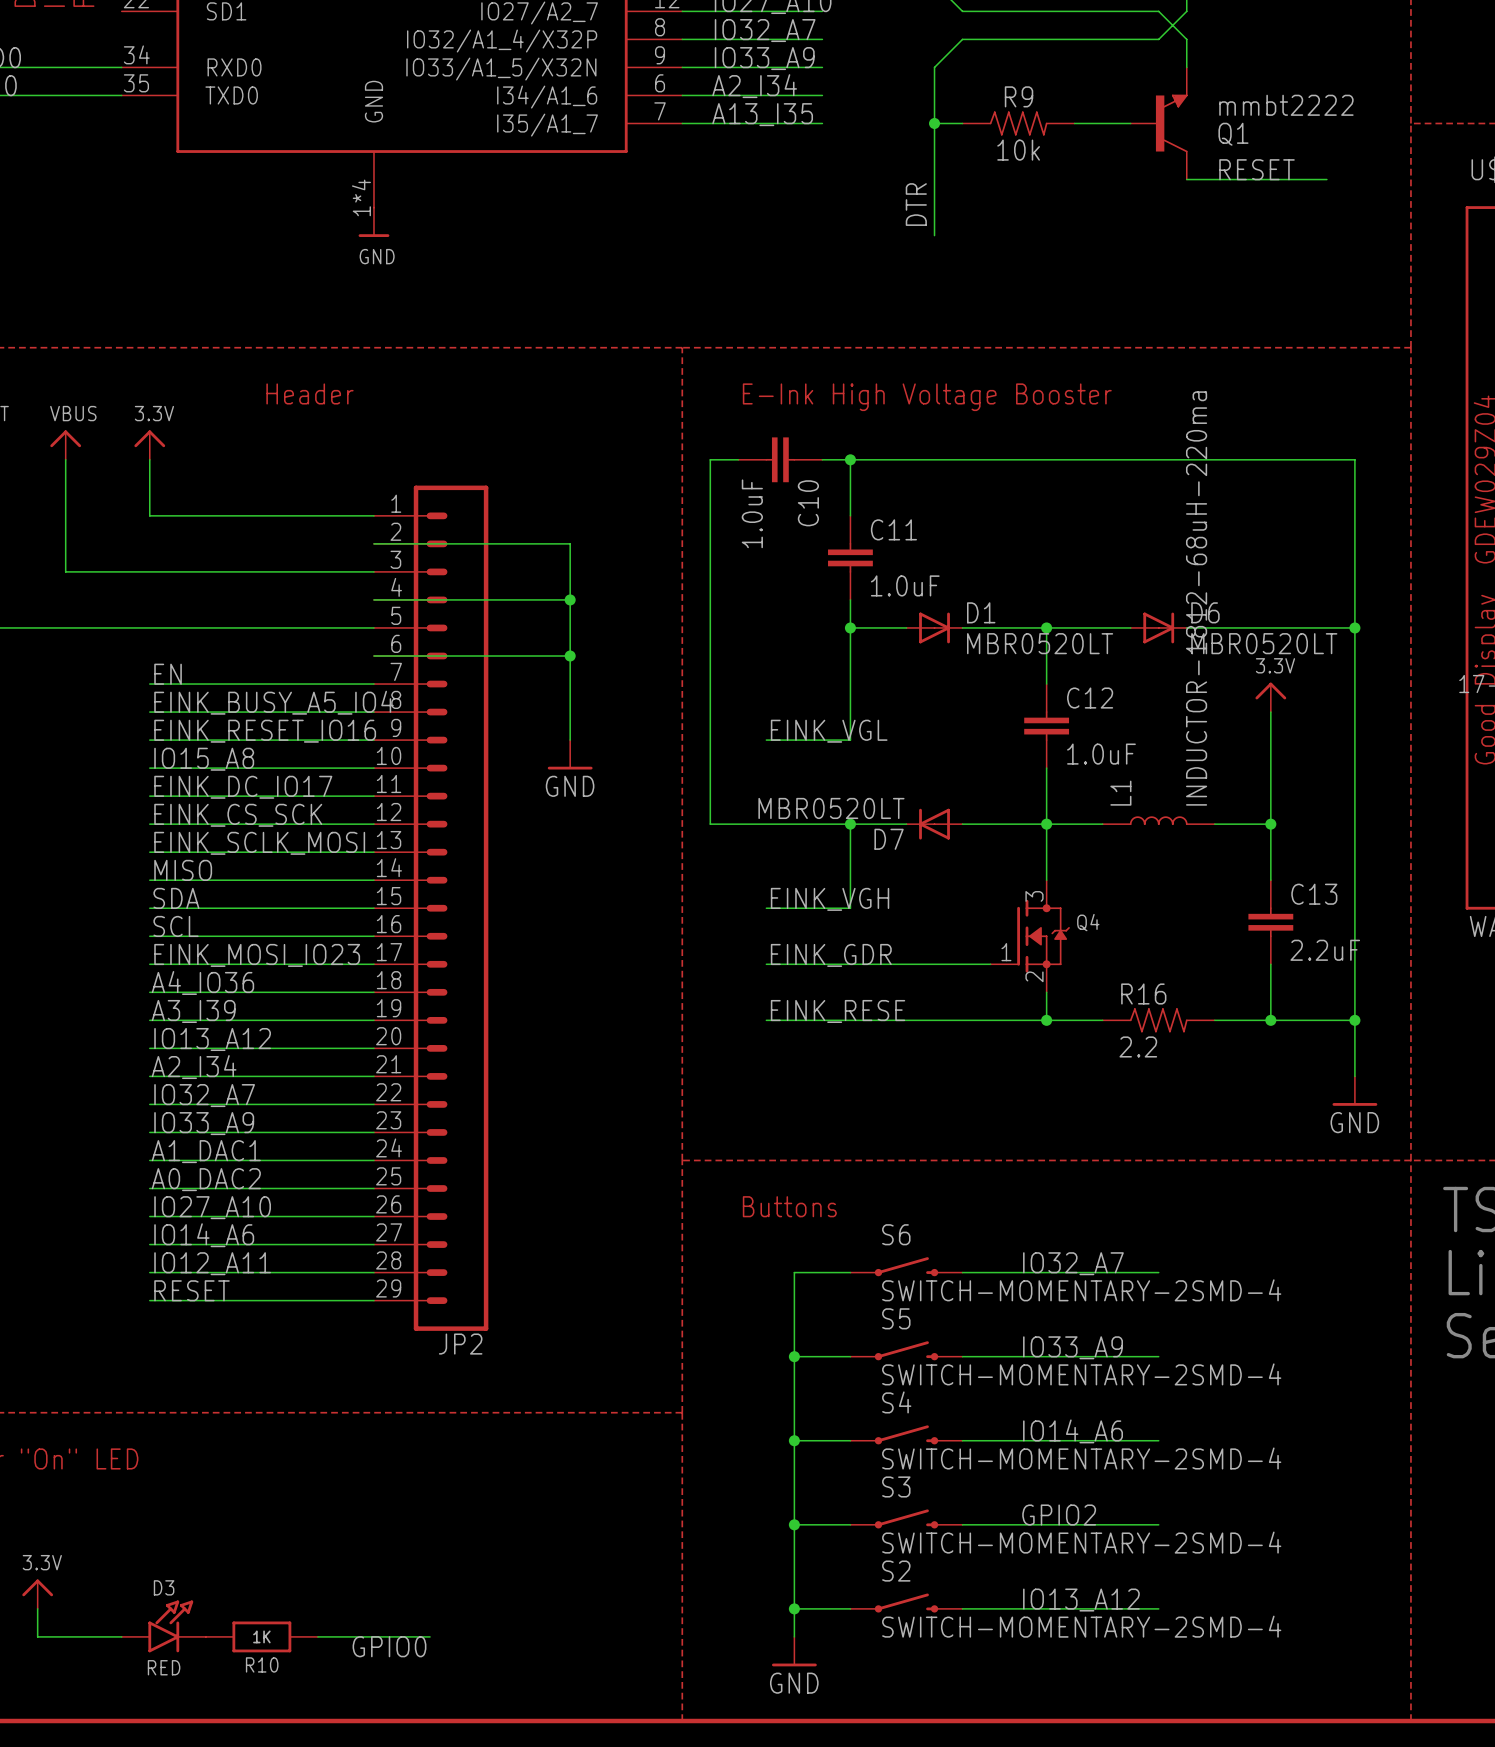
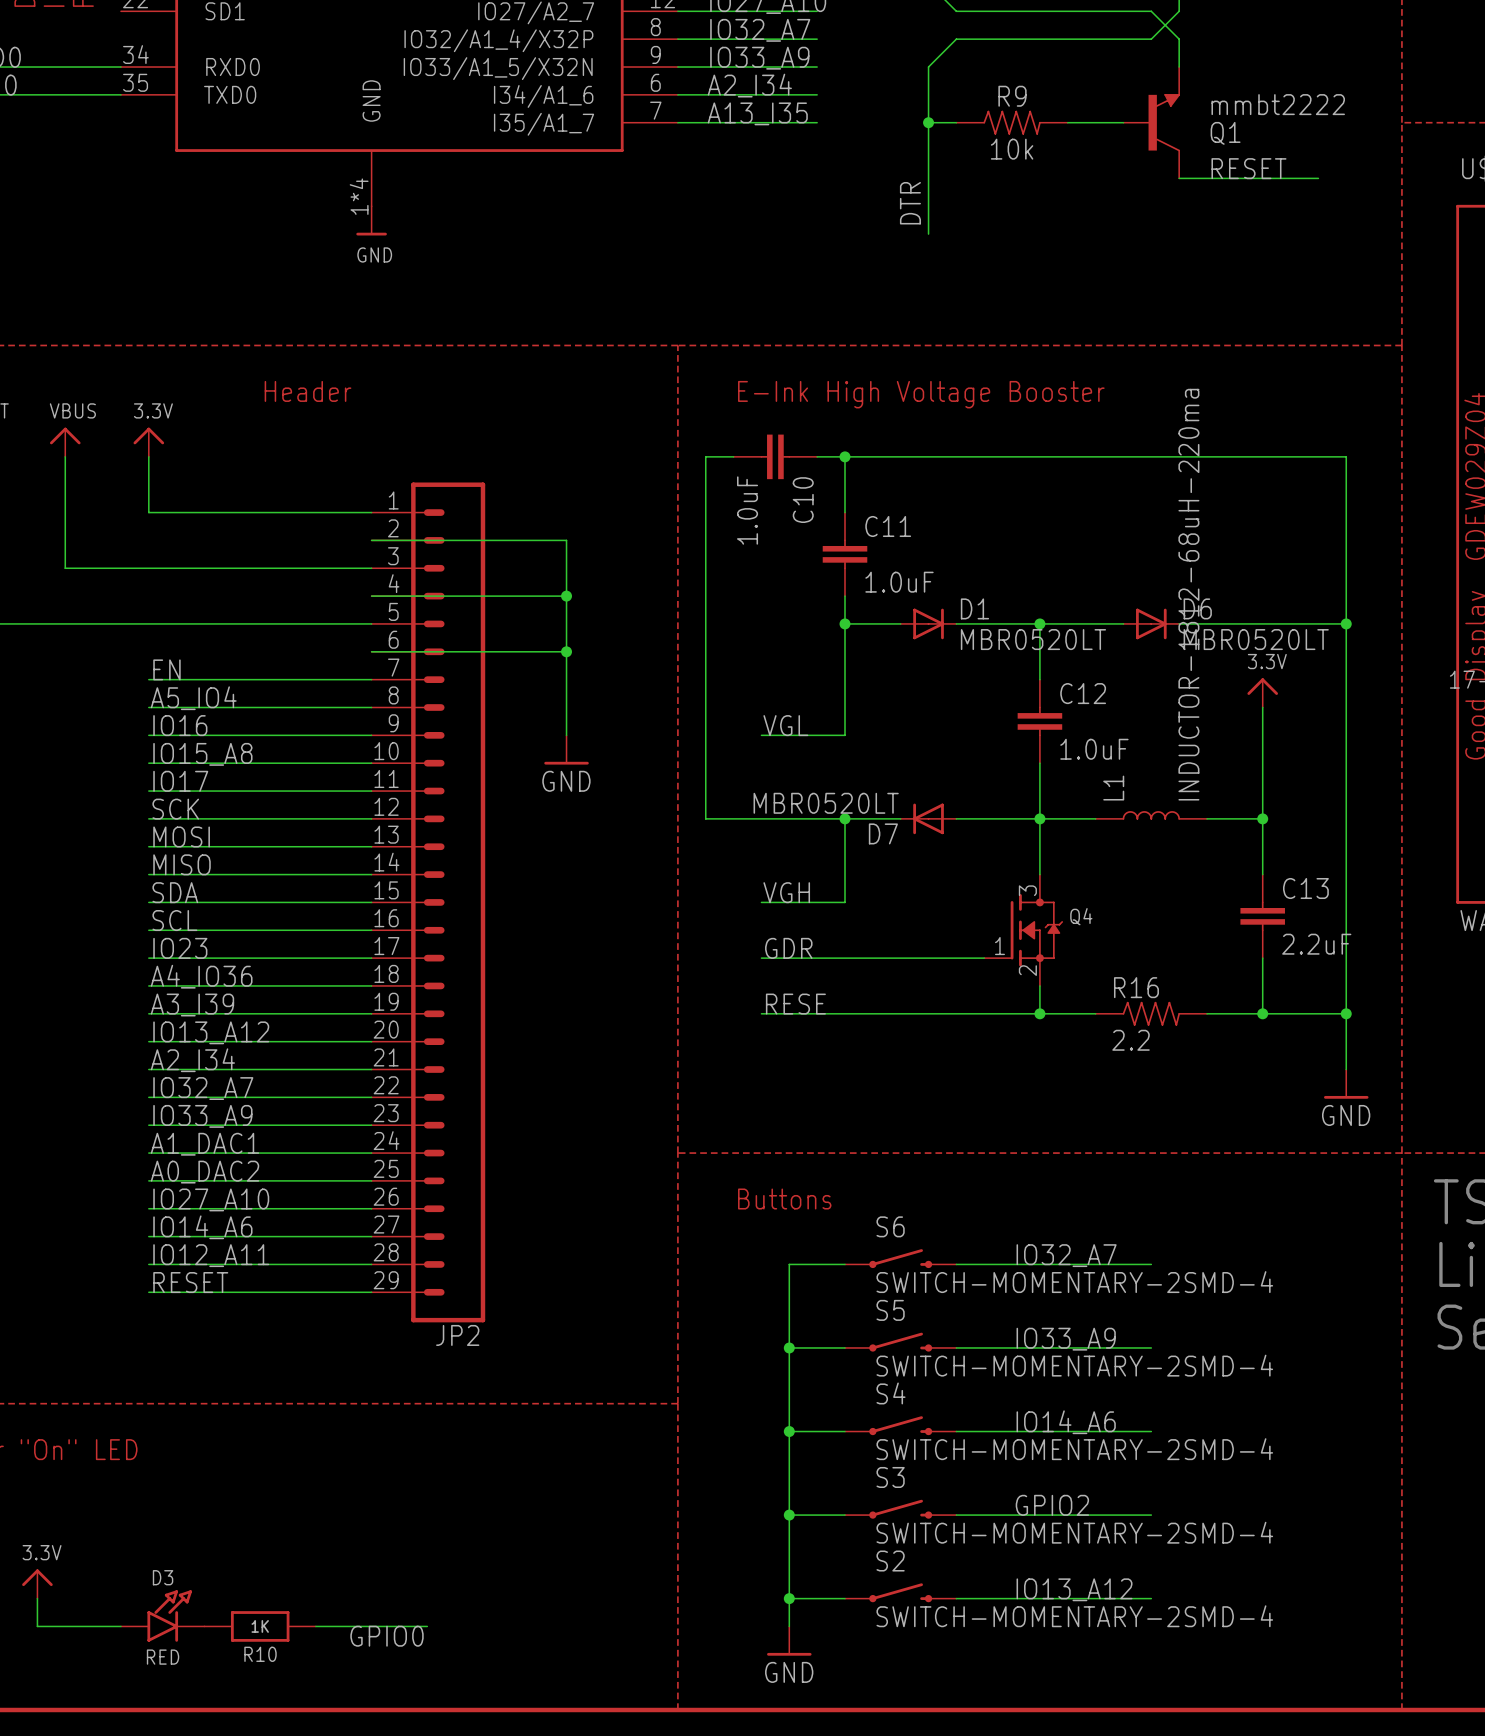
label: EINK_BUSY_A5_IO4 (273, 702) -> A5_IO4 (193, 698)
label: EINK_RESET_IO16 (265, 731) -> IO16 (180, 725)
label: EINK_VGL (829, 731) -> VGL (785, 725)
label: EINK_DC_IO17 (243, 787) -> IO17 (180, 781)
label: EINK_CS_SCK (238, 815) -> SCK (175, 809)
label: EINK_SCLK_MOSI (259, 843) -> MOSI (181, 836)
label: EINK_VGH (830, 899) -> VGH (786, 892)
label: EINK_MOSI_IO23 (257, 955) -> IO23 (180, 948)
label: EINK_GDR (831, 955) -> GDR (788, 948)
label: EINK_RESE (838, 1011) -> RESE (795, 1004)

